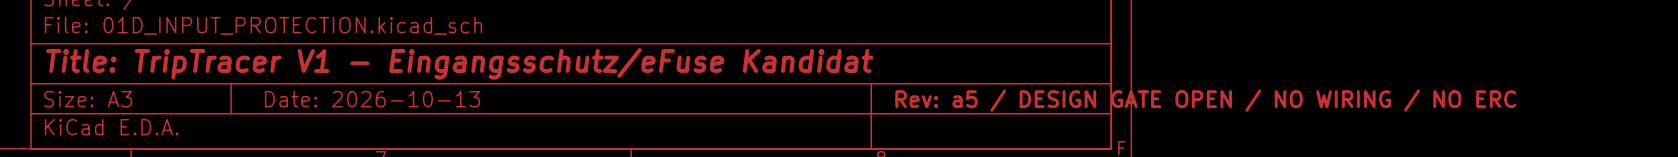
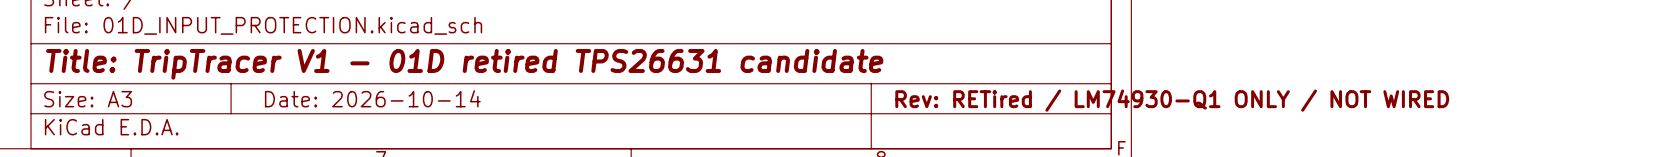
title block: Title: TripTracer V1 - Eingangsschutz/eFuse Kandidat (459, 63) -> Title: TripTracer V1 - 01D retired TPS26631 candidate (464, 64)
title block: Date: 2026-10-13 (372, 99) -> Date: 2026-10-14 (372, 98)
title block: Rev: a5 / DESIGN GATE OPEN / NO WIRING / NO ERC (1205, 100) -> Rev: RETired / LM74930-Q1 ONLY / NOT WIRED (1172, 100)

